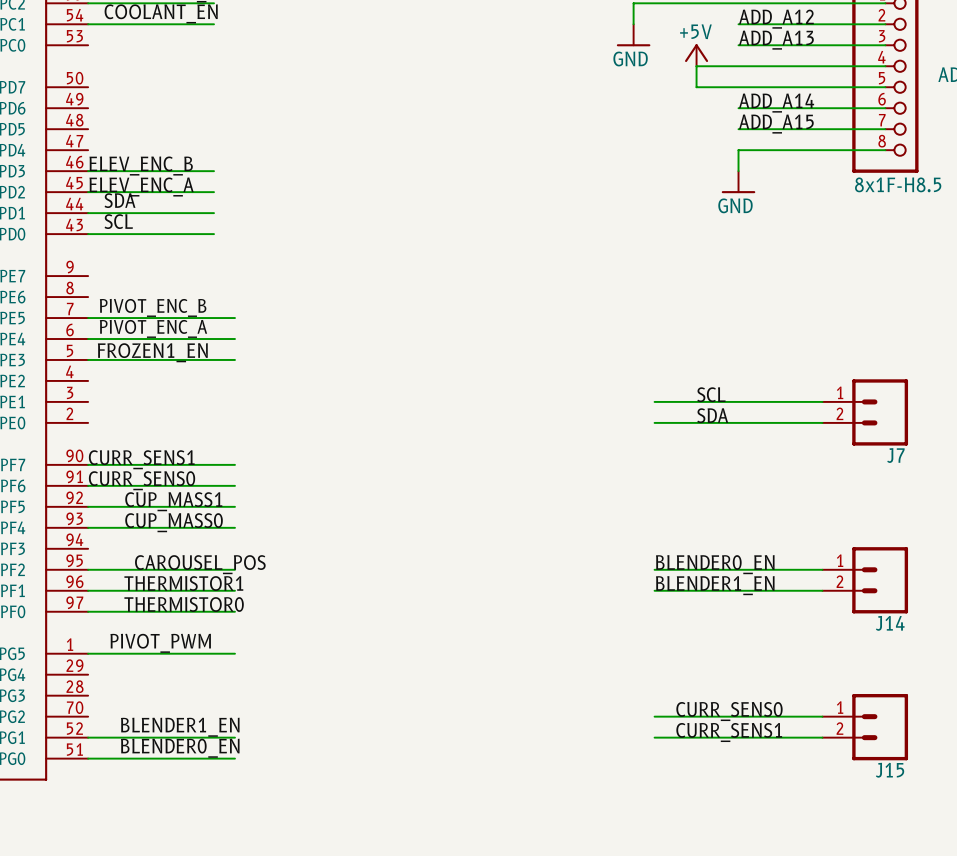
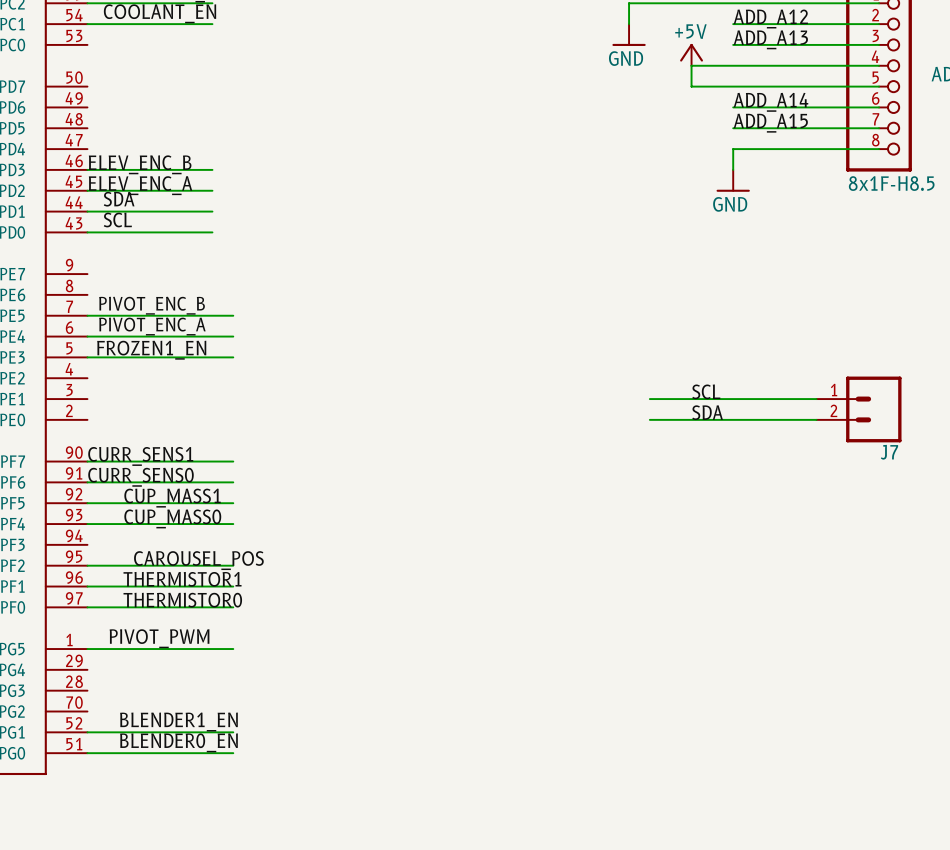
label: BLENDER0_EN (715, 564) -> none
wire: (654, 569) (822, 569) -> none
J14: (865, 580) -> none
label: BLENDER1_EN (715, 585) -> none
wire: (654, 590) (822, 590) -> none
label: CURR_SENS0 (729, 711) -> none
wire: (654, 716) (822, 716) -> none
J15: (865, 727) -> none
label: CURR_SENS1 (729, 732) -> none
wire: (654, 737) (822, 737) -> none

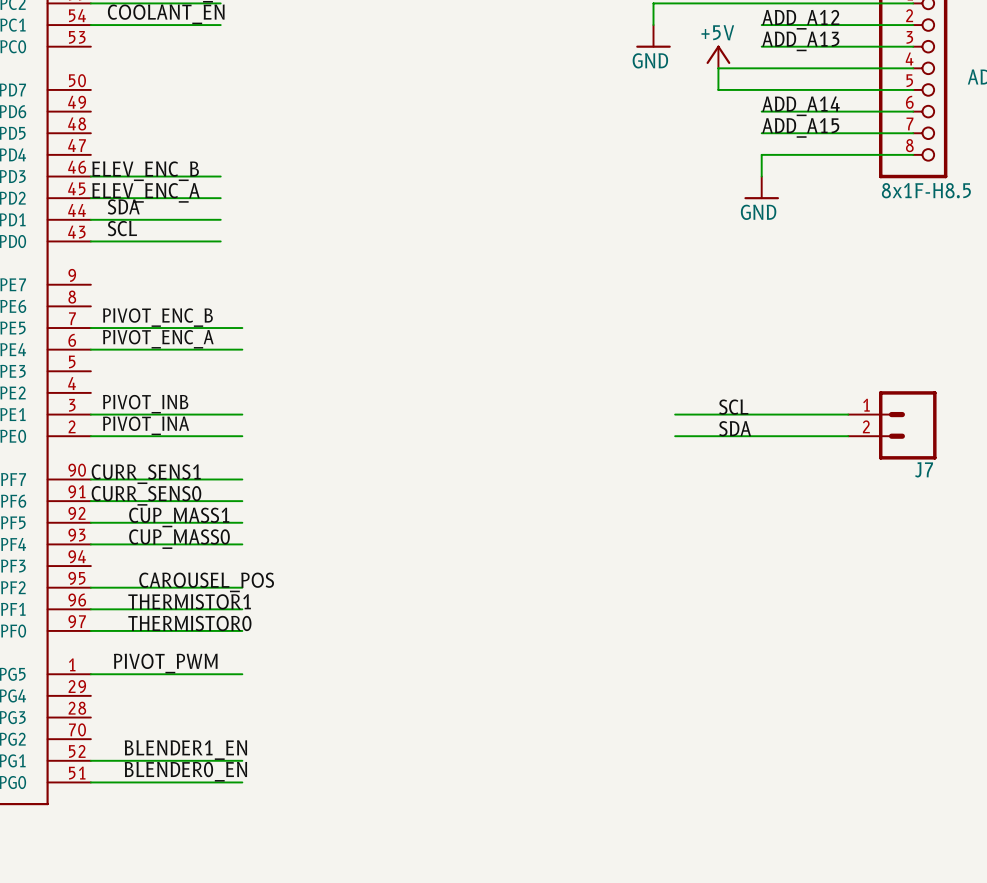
label: FROZEN1_EN (151, 350) -> none
wire: (87, 357) (233, 357) -> (90, 414) (242, 414)
label: none -> PIVOT_INB (145, 404)
label: none -> PIVOT_INA (146, 425)
wire: none -> (90, 436) (242, 436)

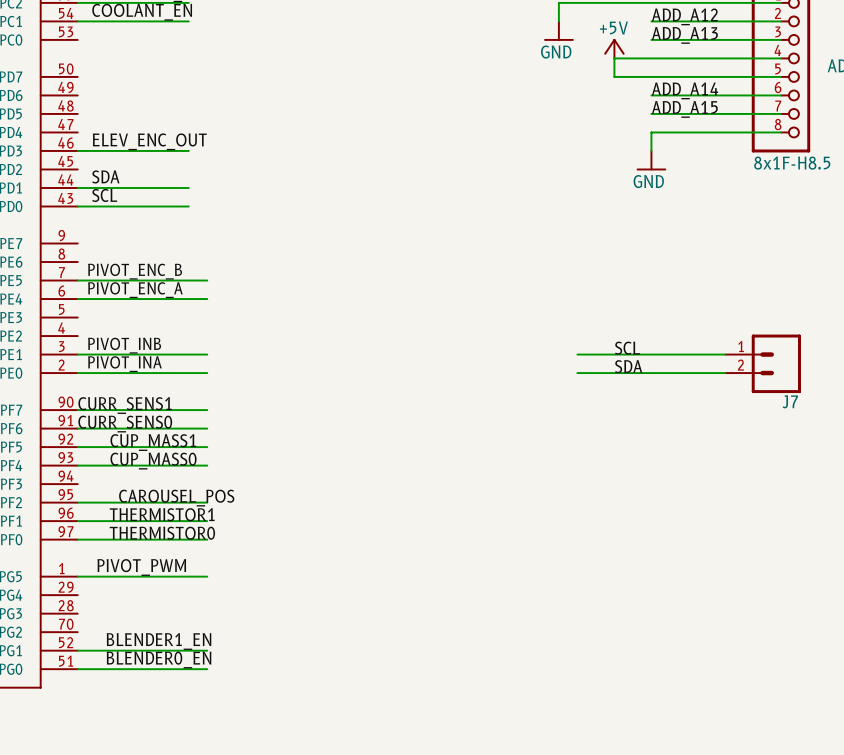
label: none -> ELEV_ENC_OUT (149, 141)
label: ELEV_ENC_B (145, 171) -> none
label: ELEV_ENC_A (146, 192) -> none
wire: (90, 198) (220, 198) -> none

